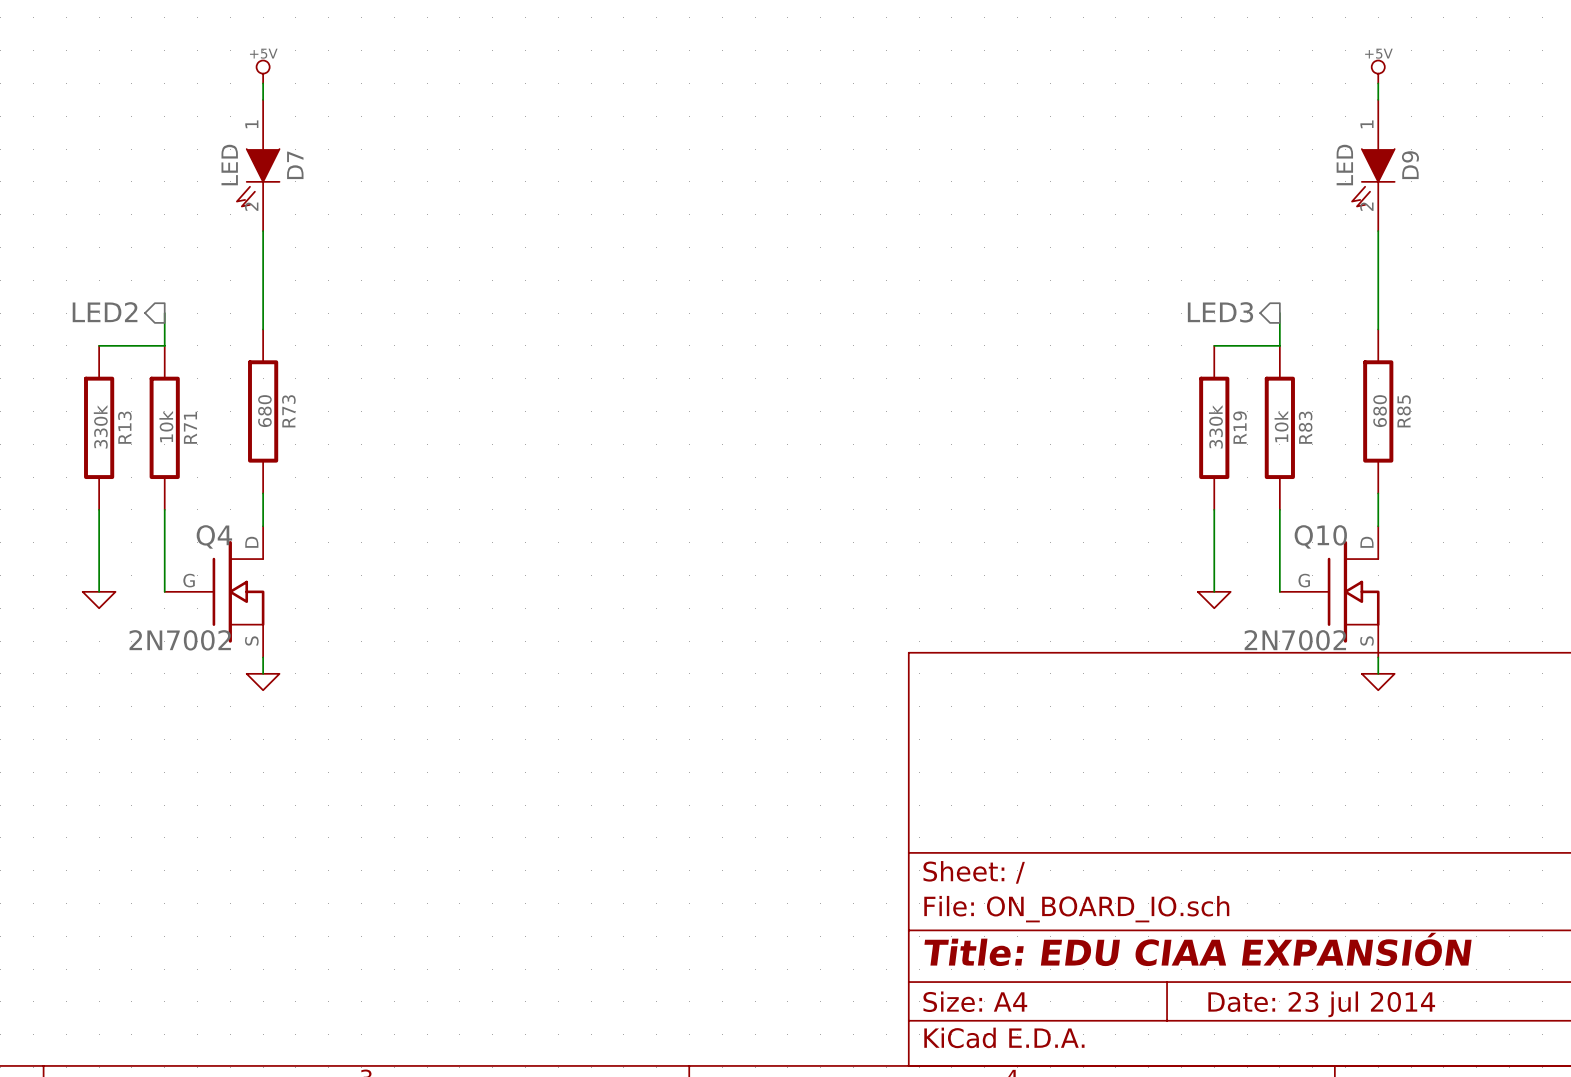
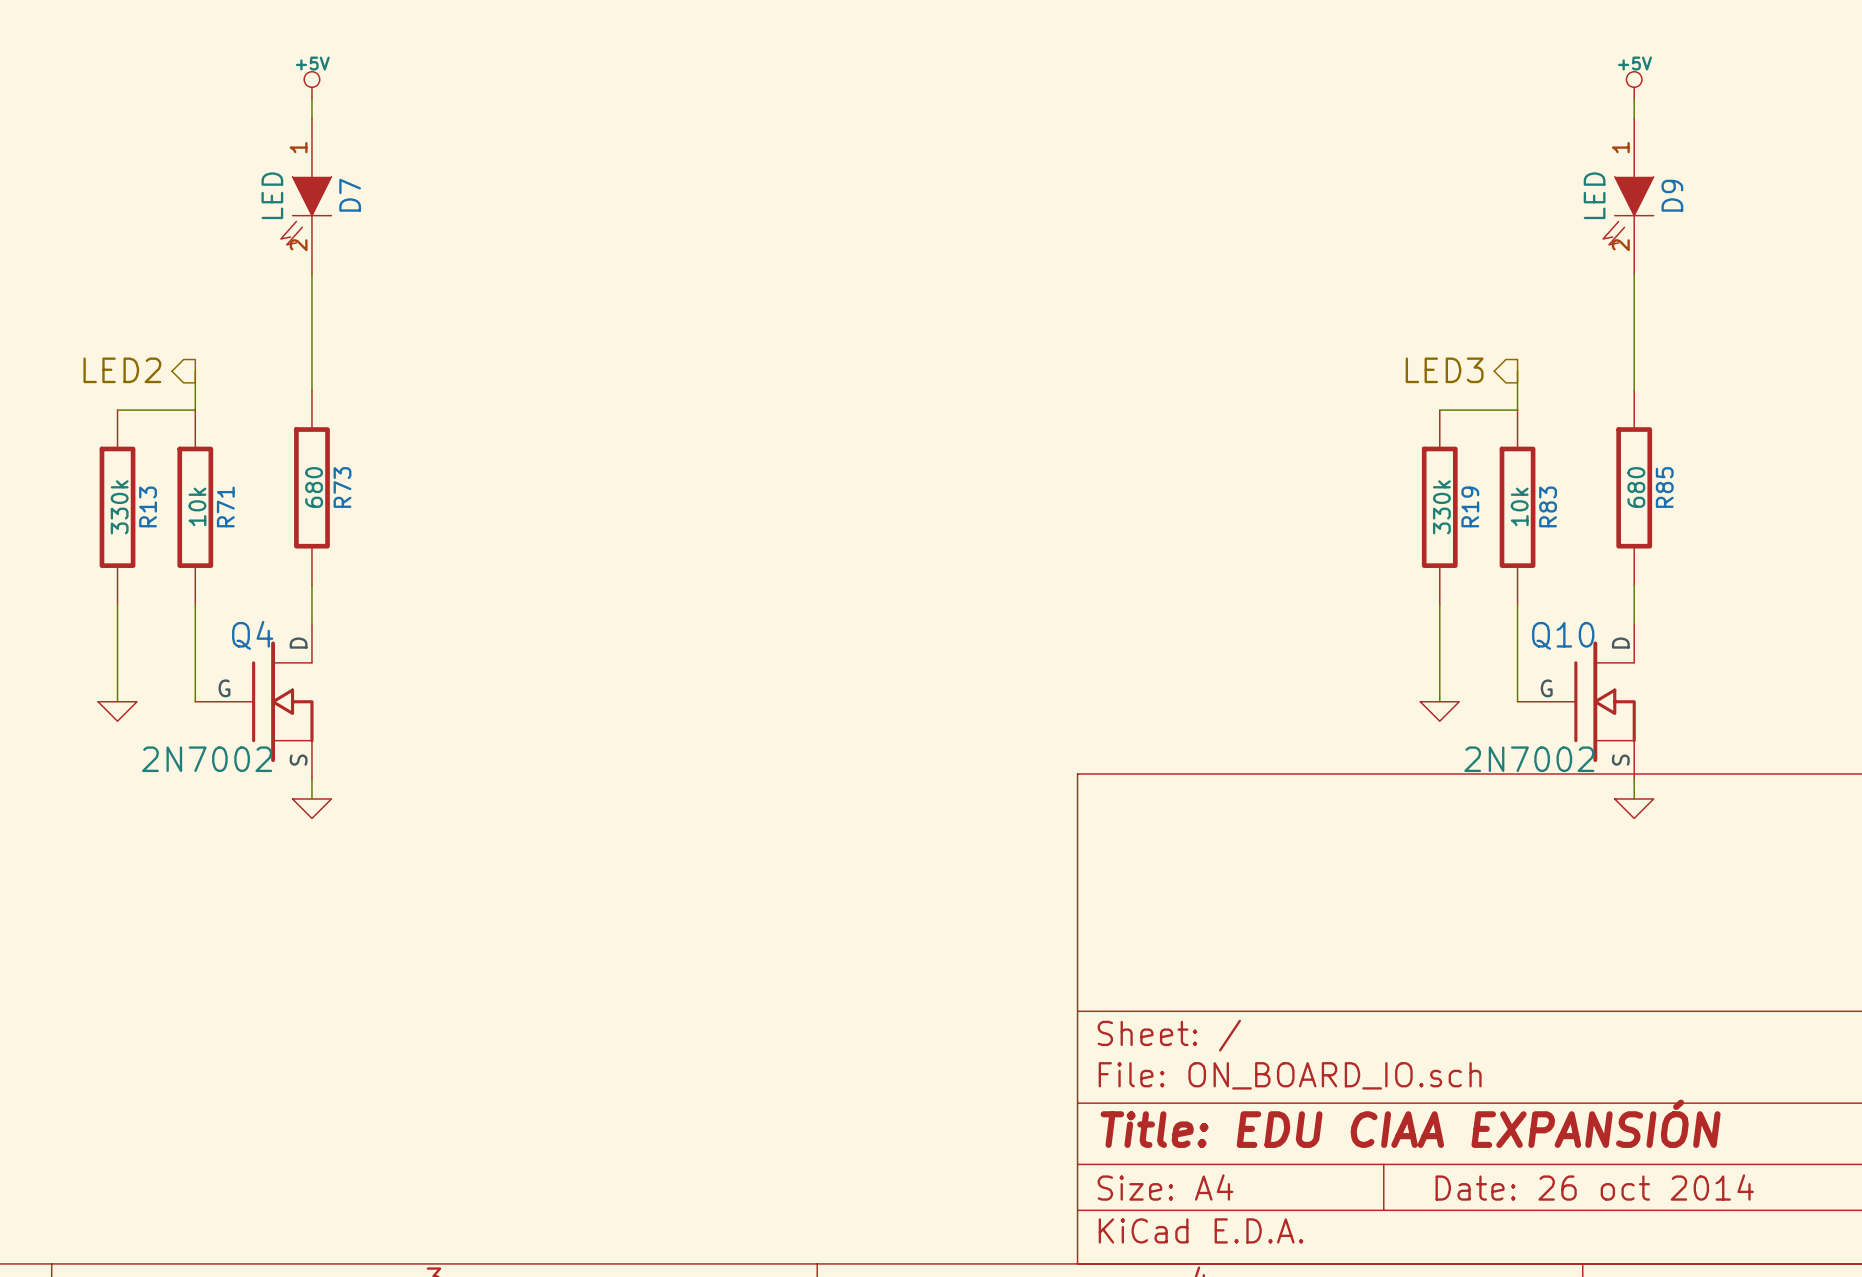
title block: Date: 23 jul 2014 (1321, 1004) -> Date: 26 oct 2014 (1594, 1187)

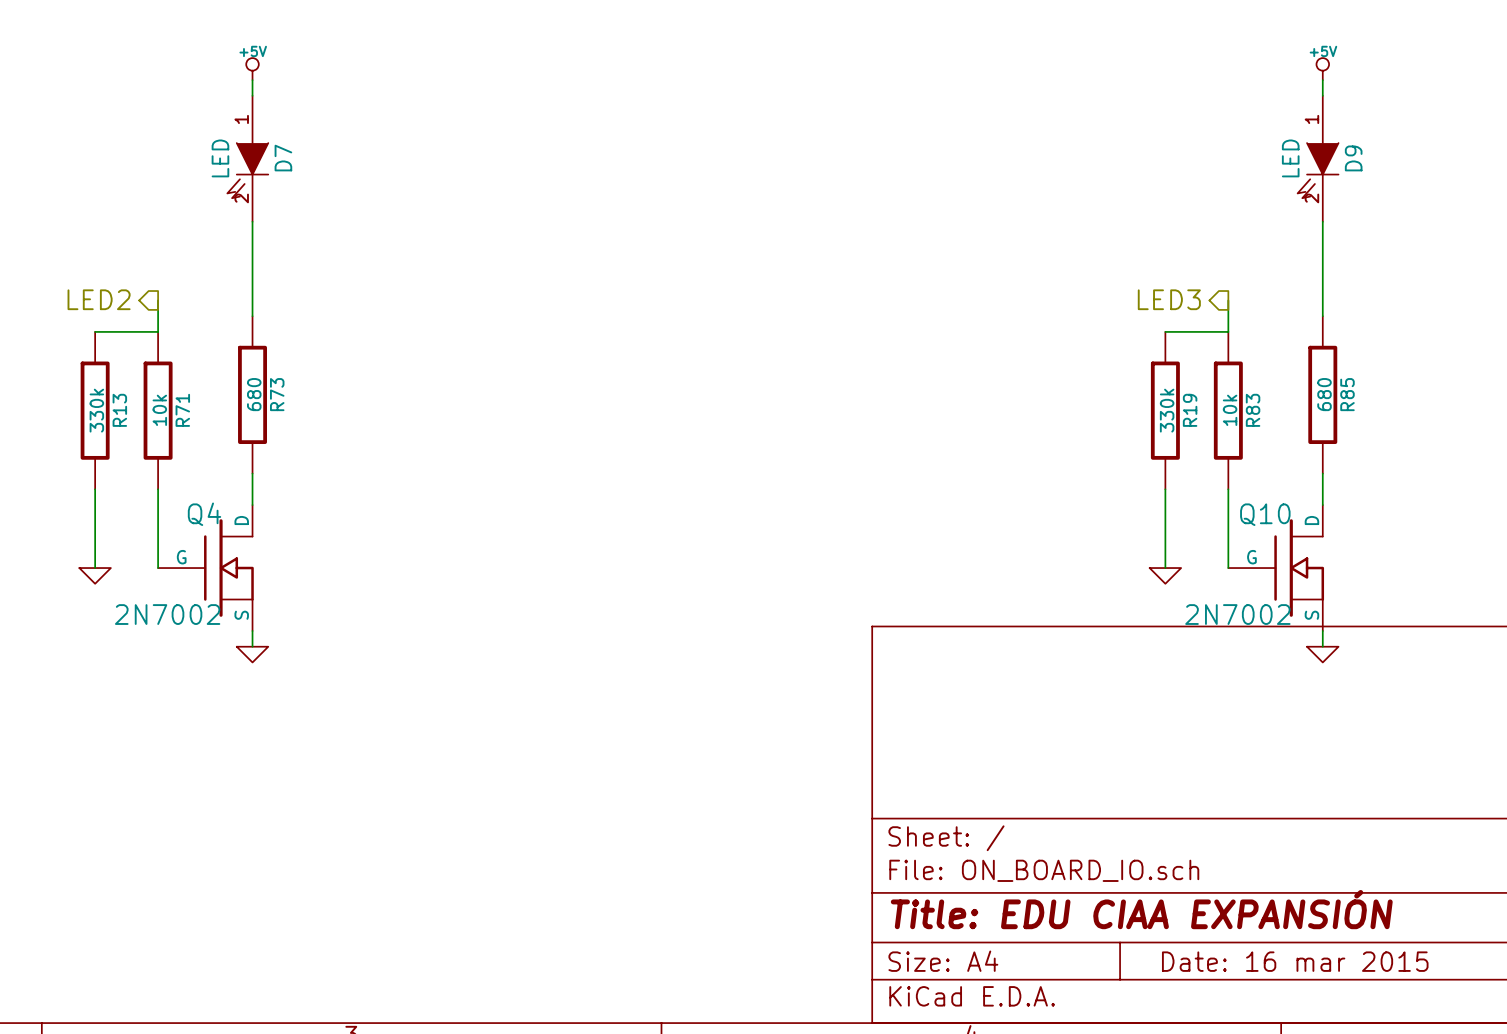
title block: Date: 26 oct 2014 (1594, 1187) -> Date: 16 mar 2015 (1295, 961)

